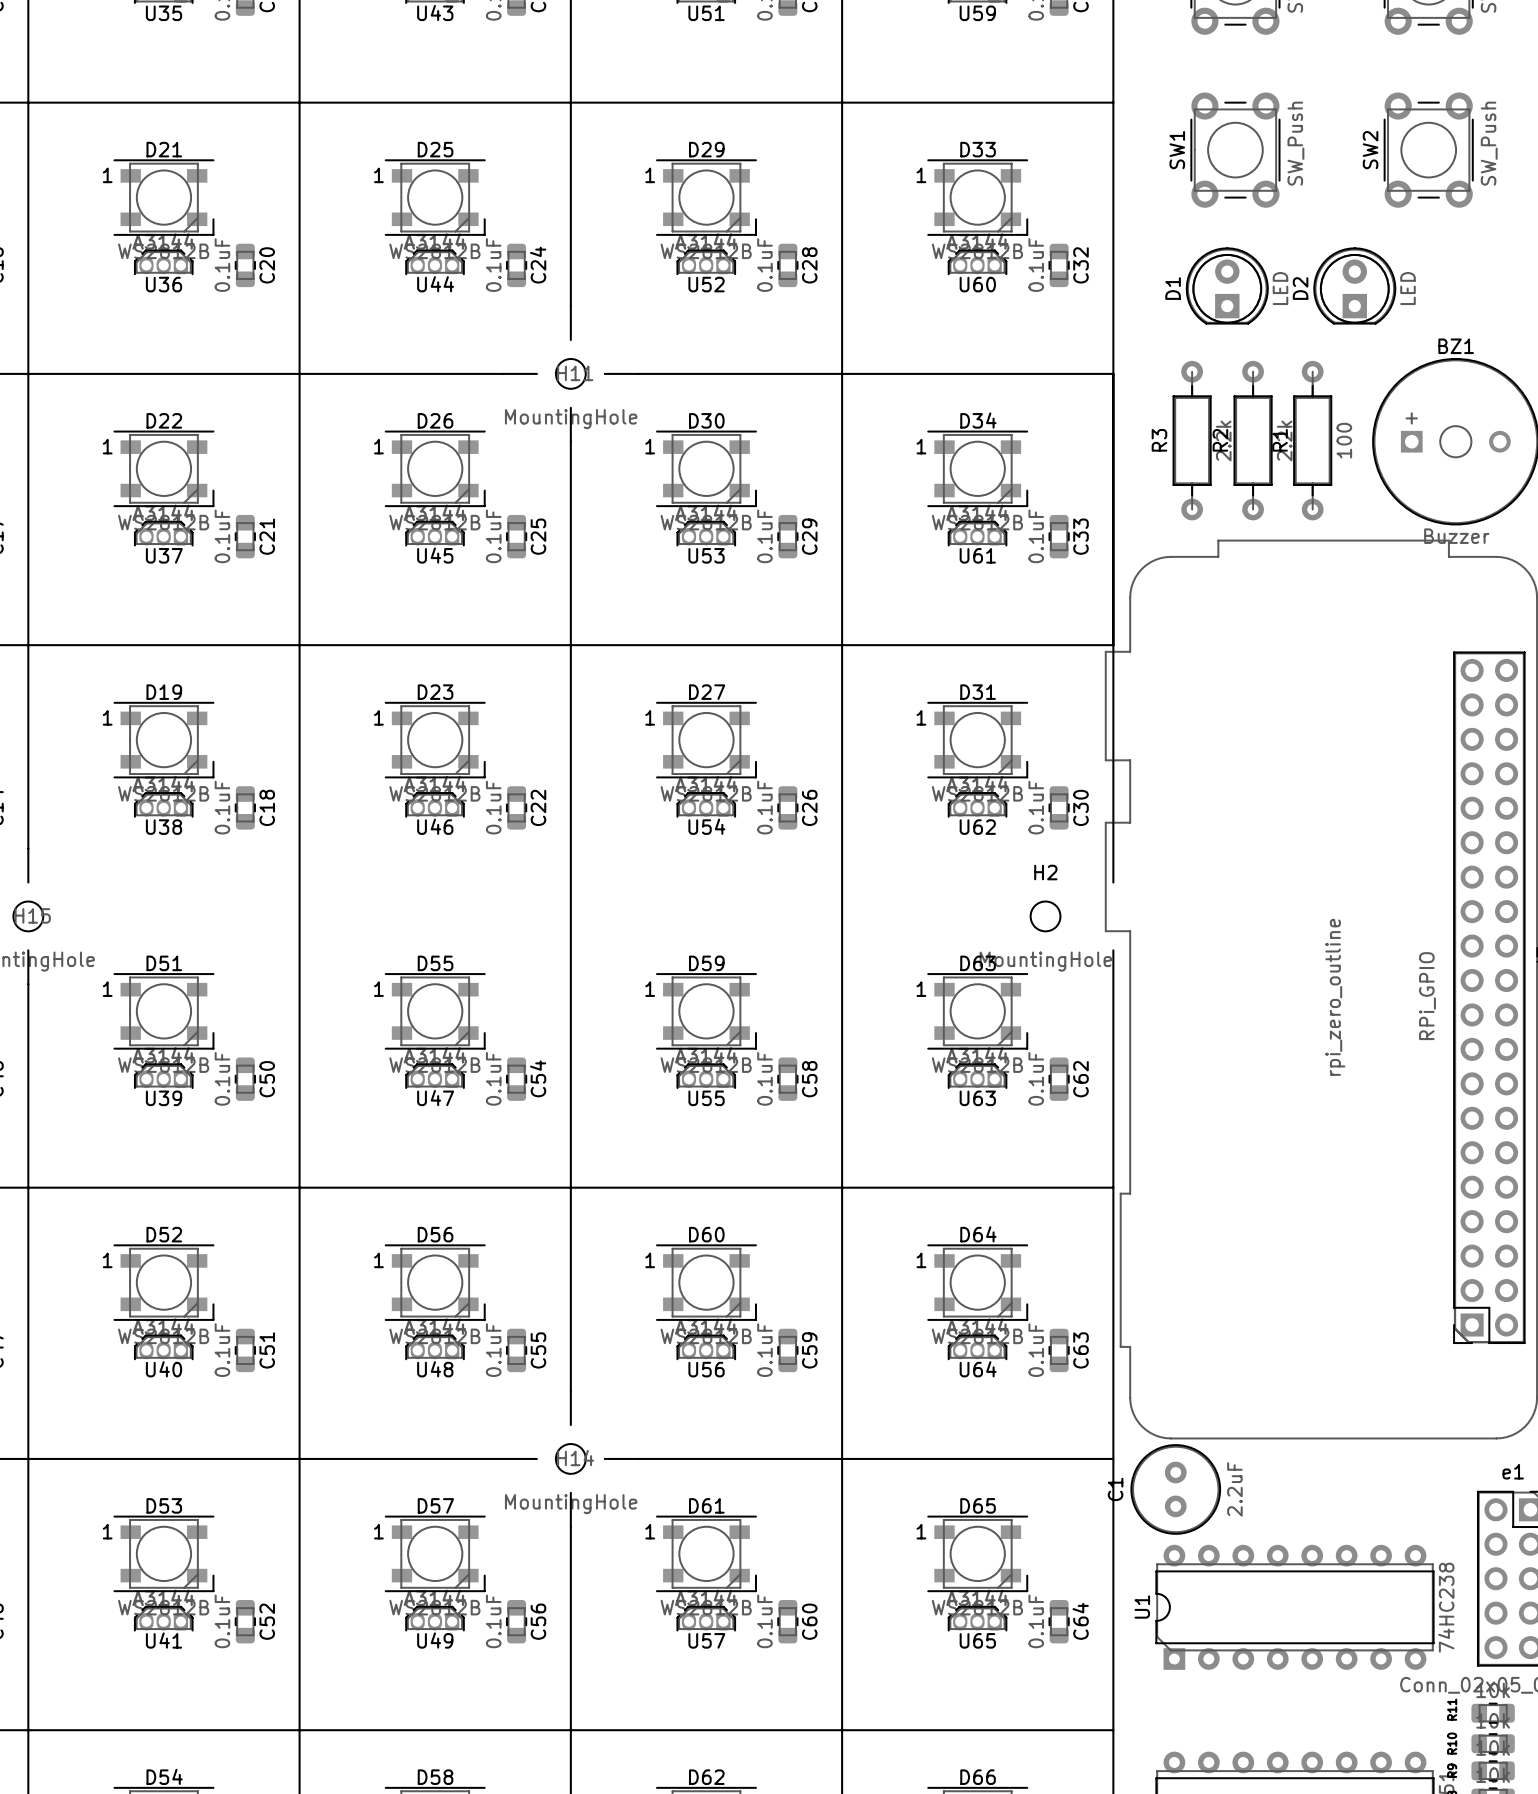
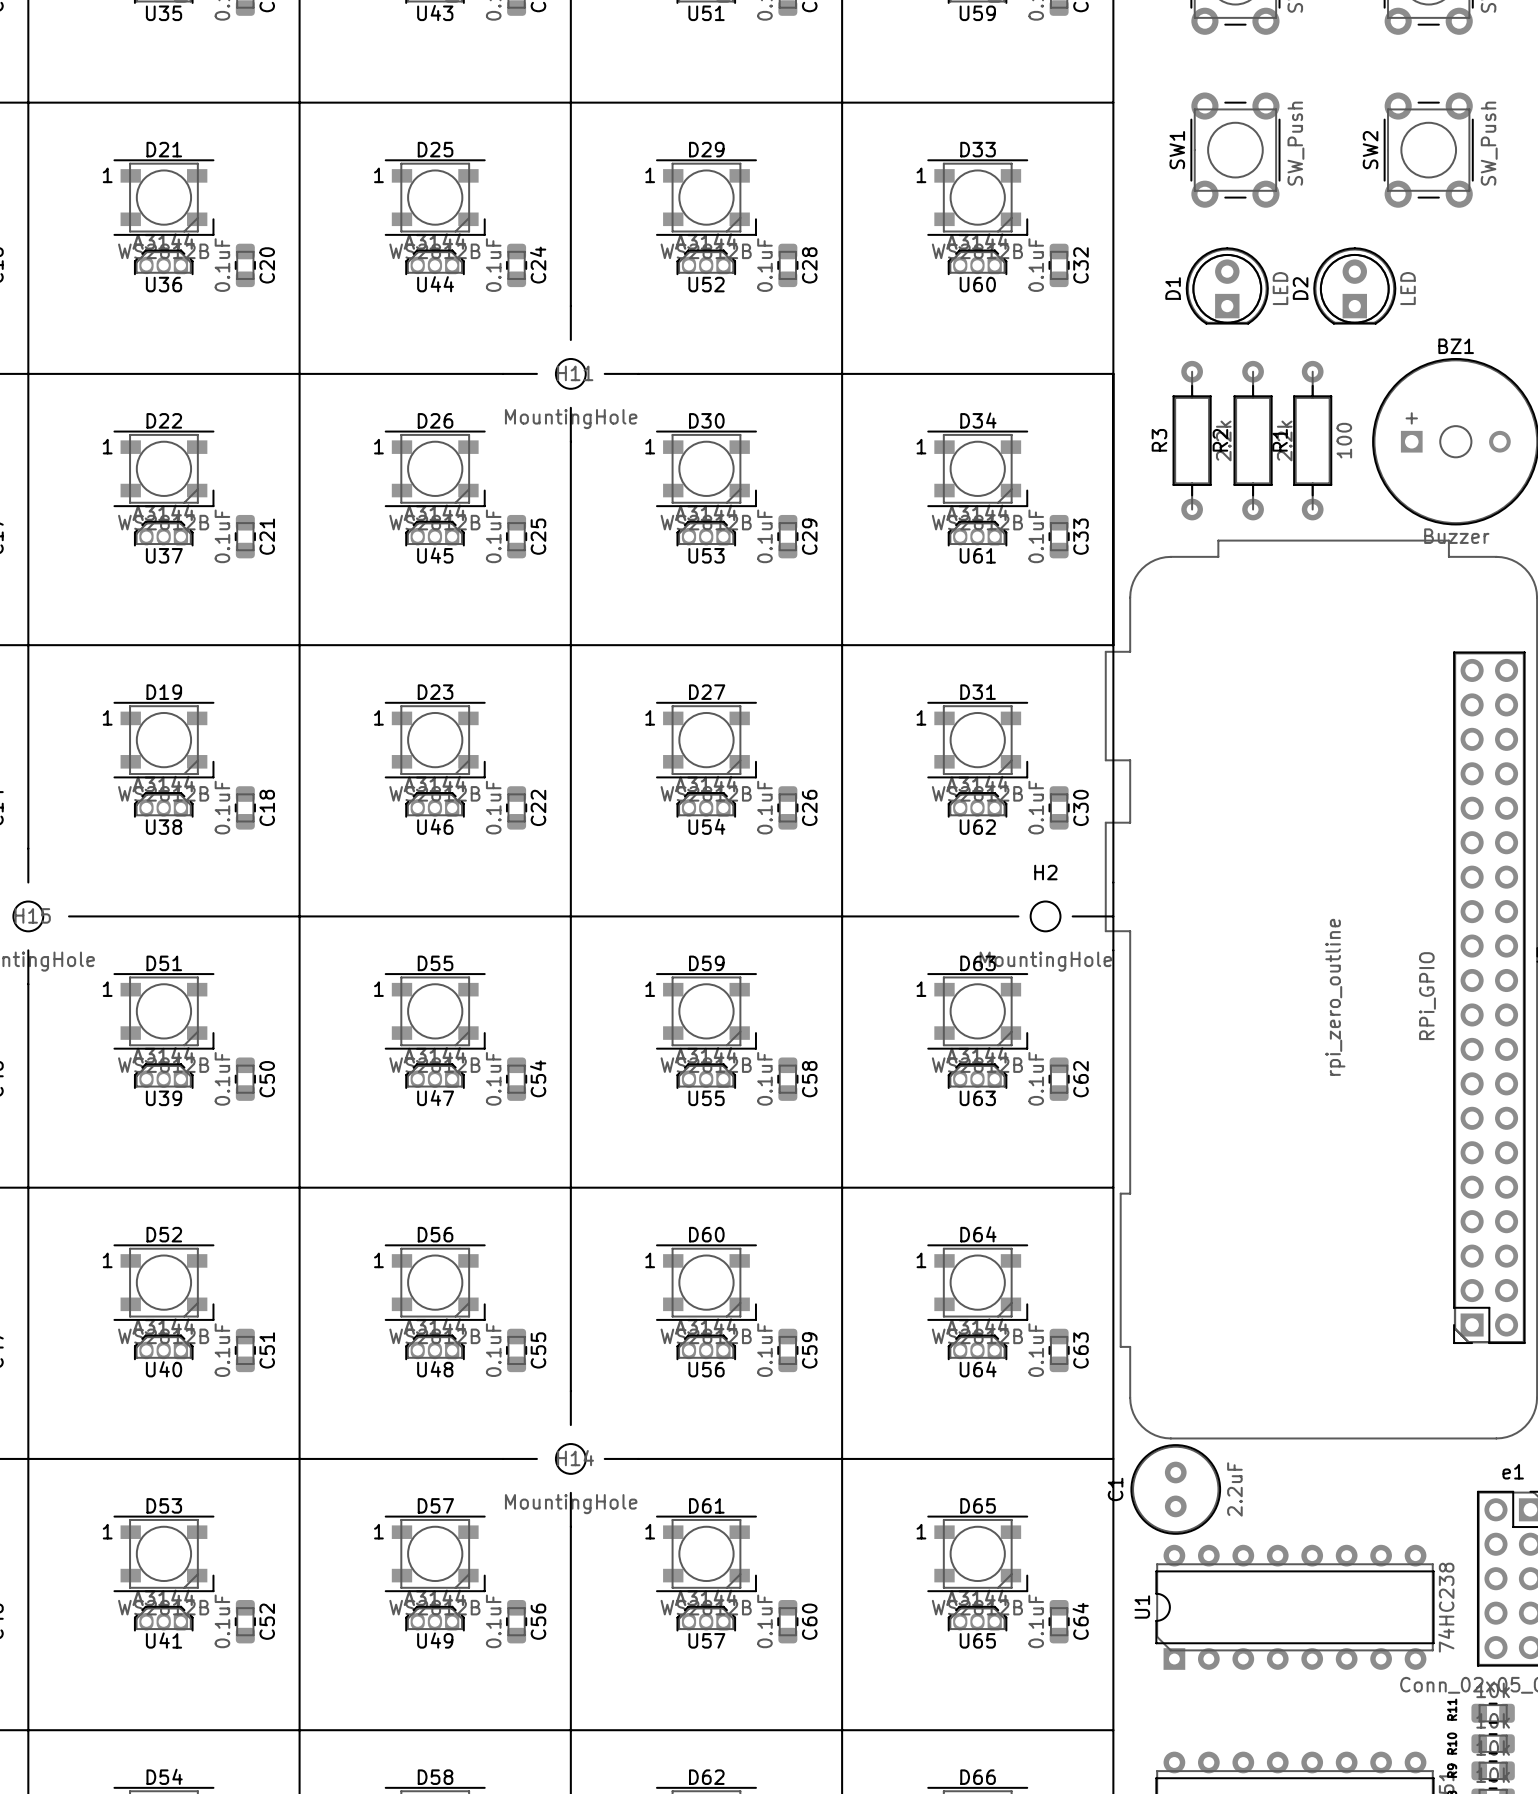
line: none -> (1113, 882) (1113, 950)
line: none -> (69, 916) (1018, 916)
line: none -> (1072, 916) (1113, 916)

